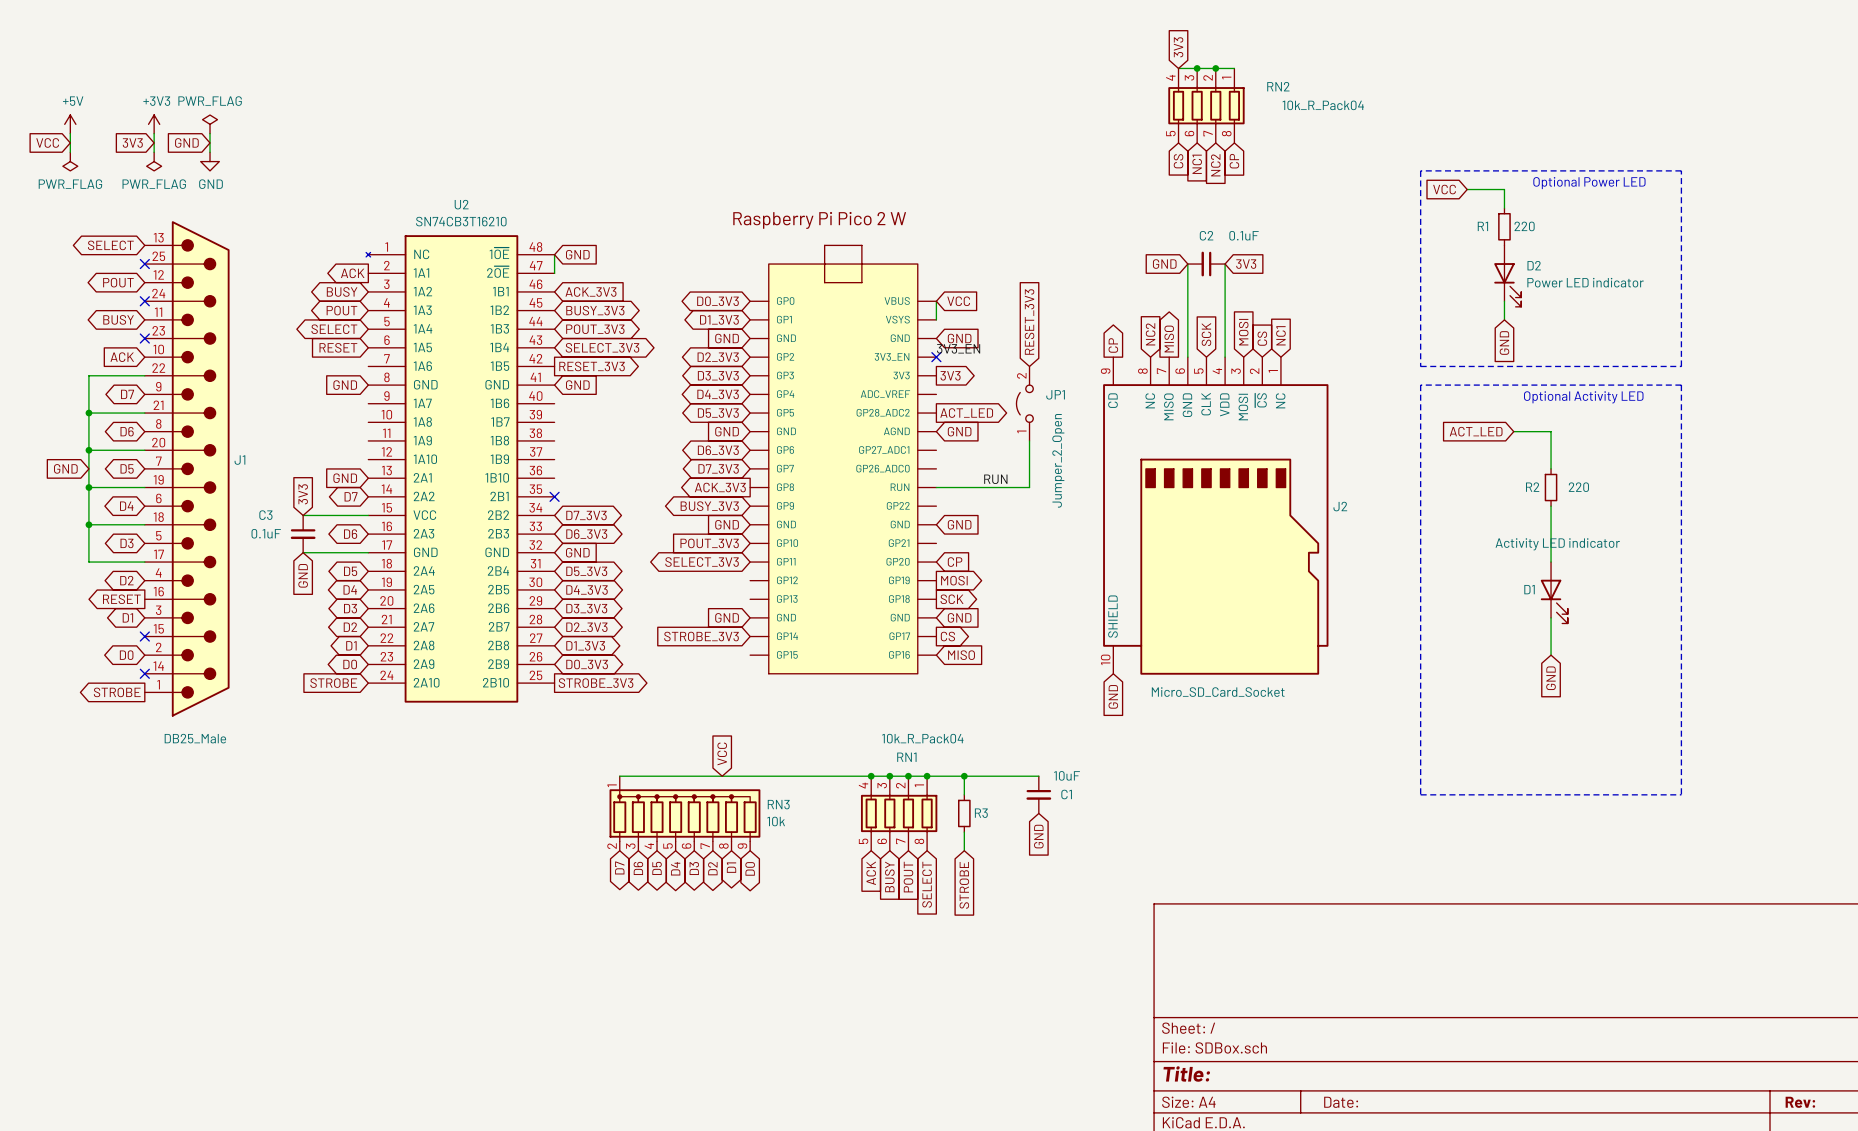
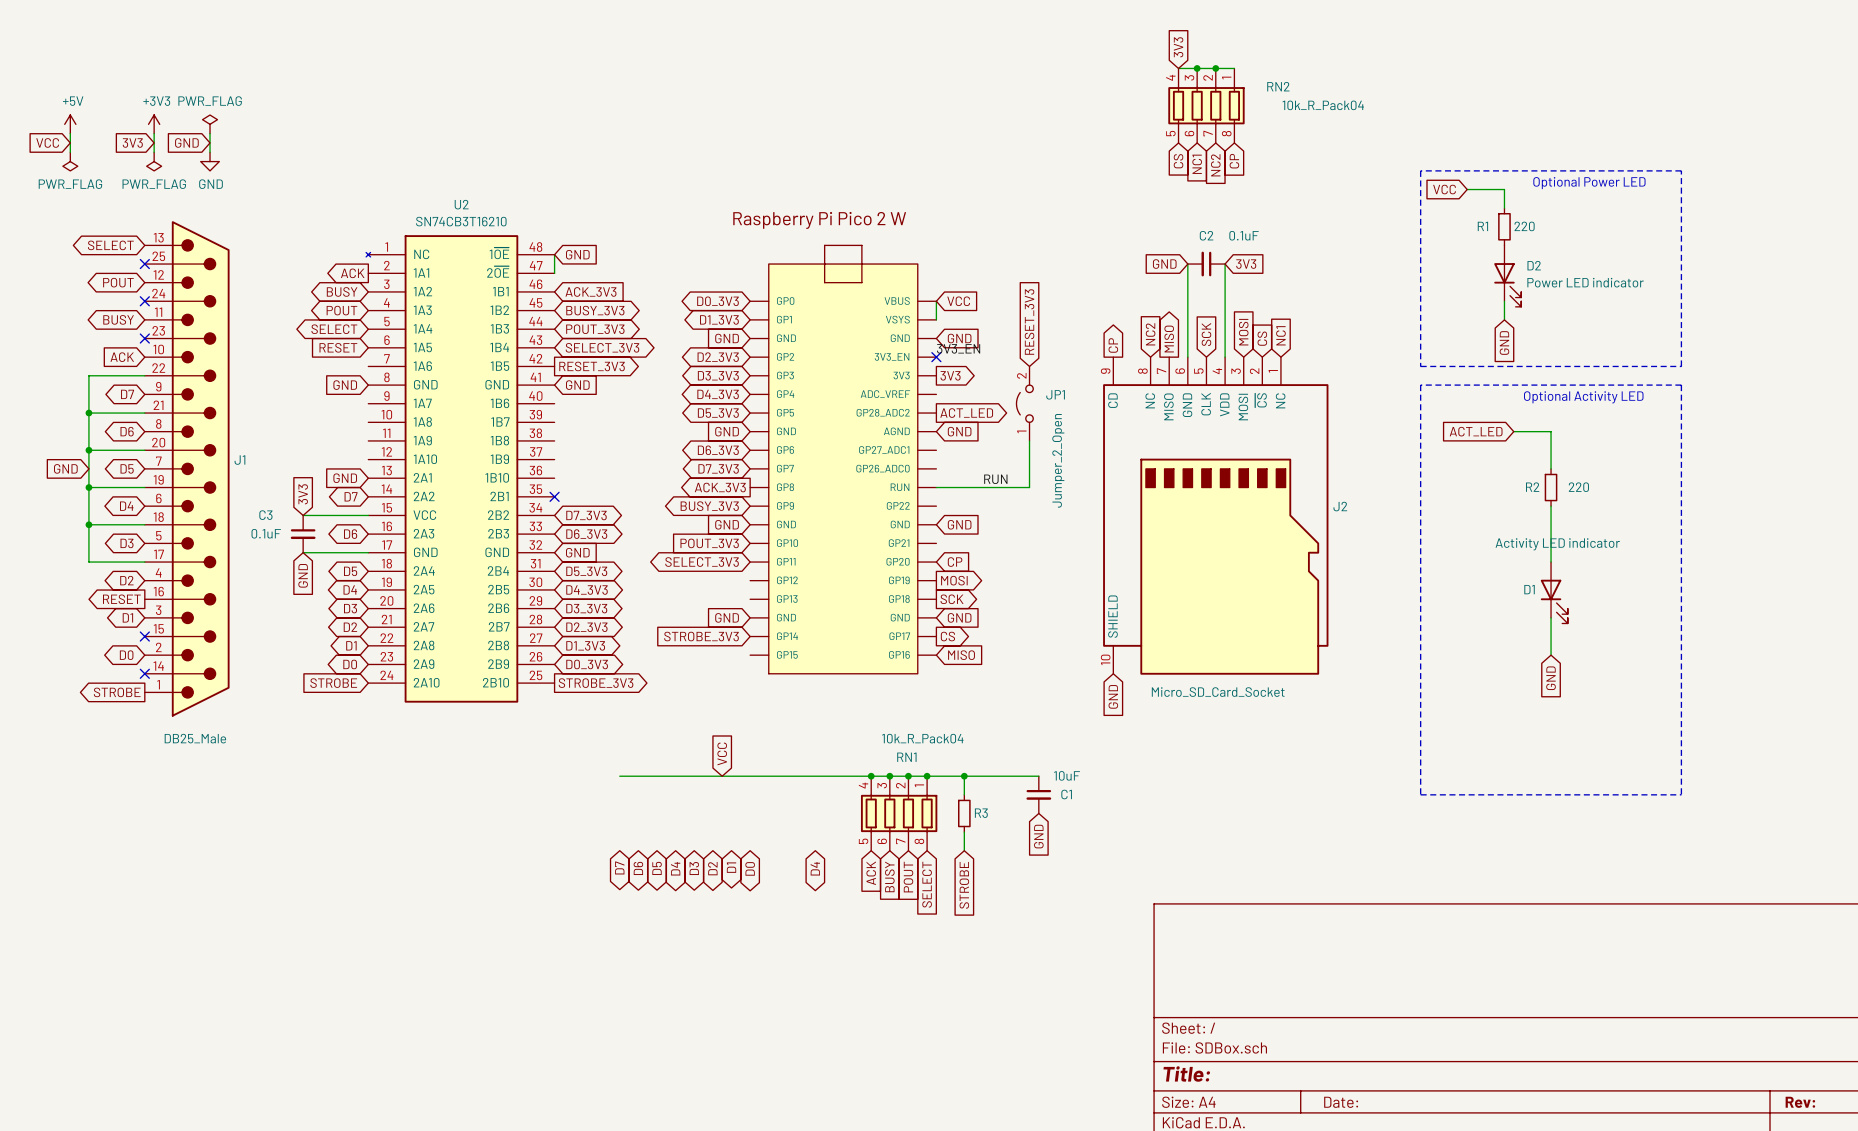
RN3: 10k (684, 813) -> none
global label: none -> D4 (815, 868)

